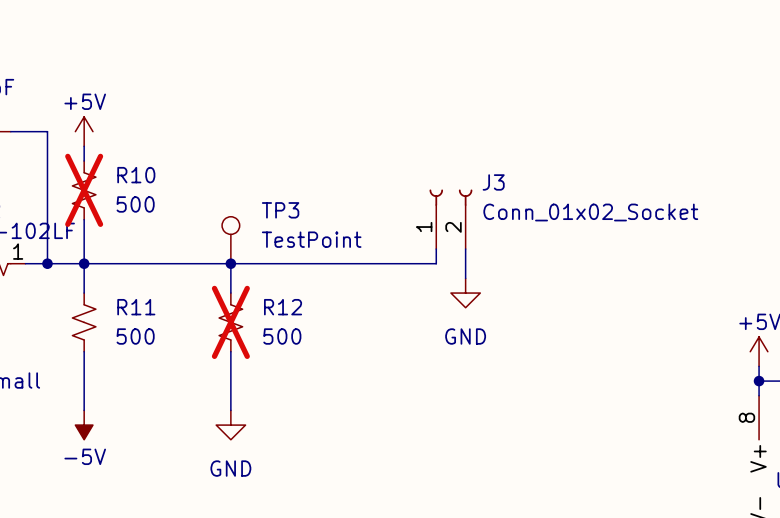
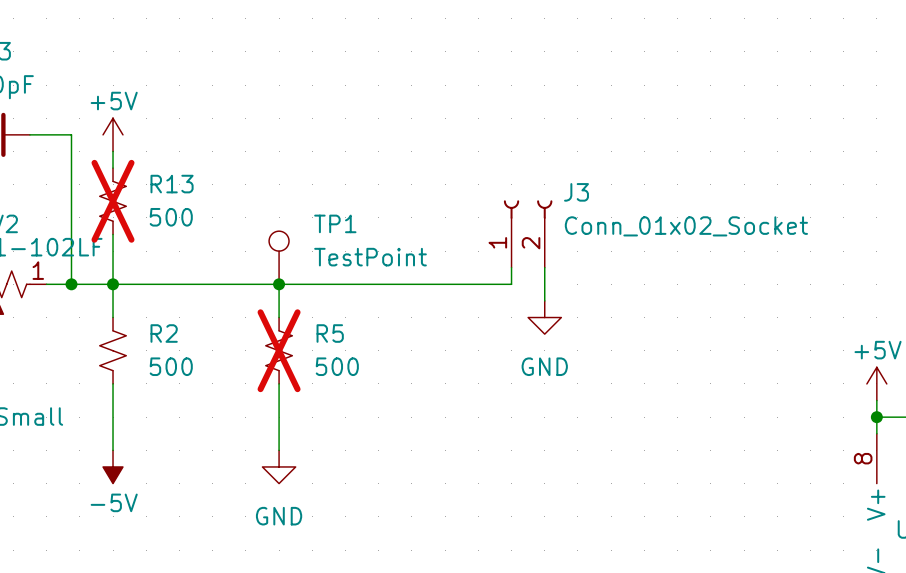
R10 name: R10 (136, 175) -> R13 (172, 184)
TP3 name: TP3 (280, 210) -> TP1 (335, 223)
R11 name: R11 (136, 307) -> R2 (164, 333)
R12 name: R12 (283, 307) -> R5 (330, 333)

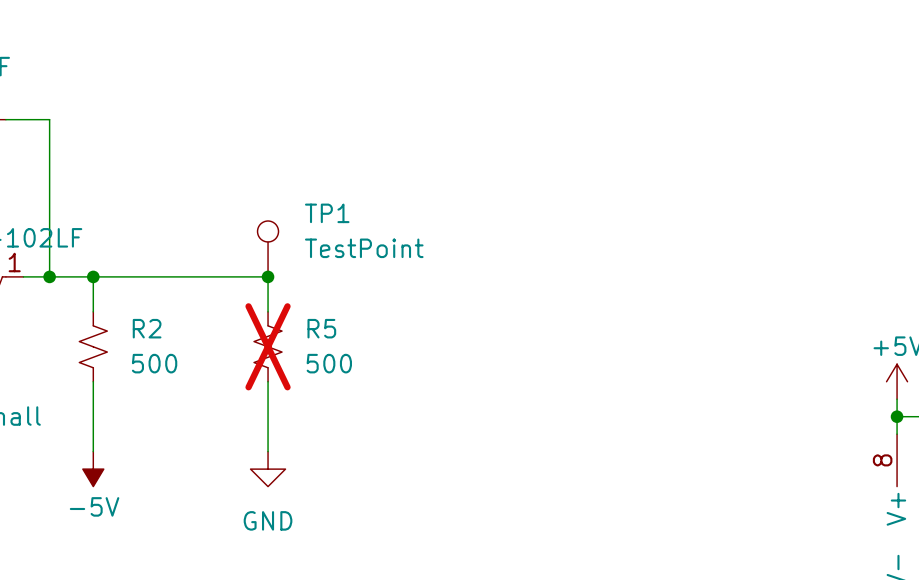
power symbol: +5V (113, 134) -> none
wire: (113, 151) (113, 168) -> none
R13: 500 (113, 201) -> none
wire: (113, 234) (113, 284) -> none
J3: Conn_01x02_Socket (528, 234) -> none
wire: (511, 267) (511, 284) (279, 284) -> none
wire: (544, 267) (544, 300) -> none
power symbol: GND (544, 317) -> none

